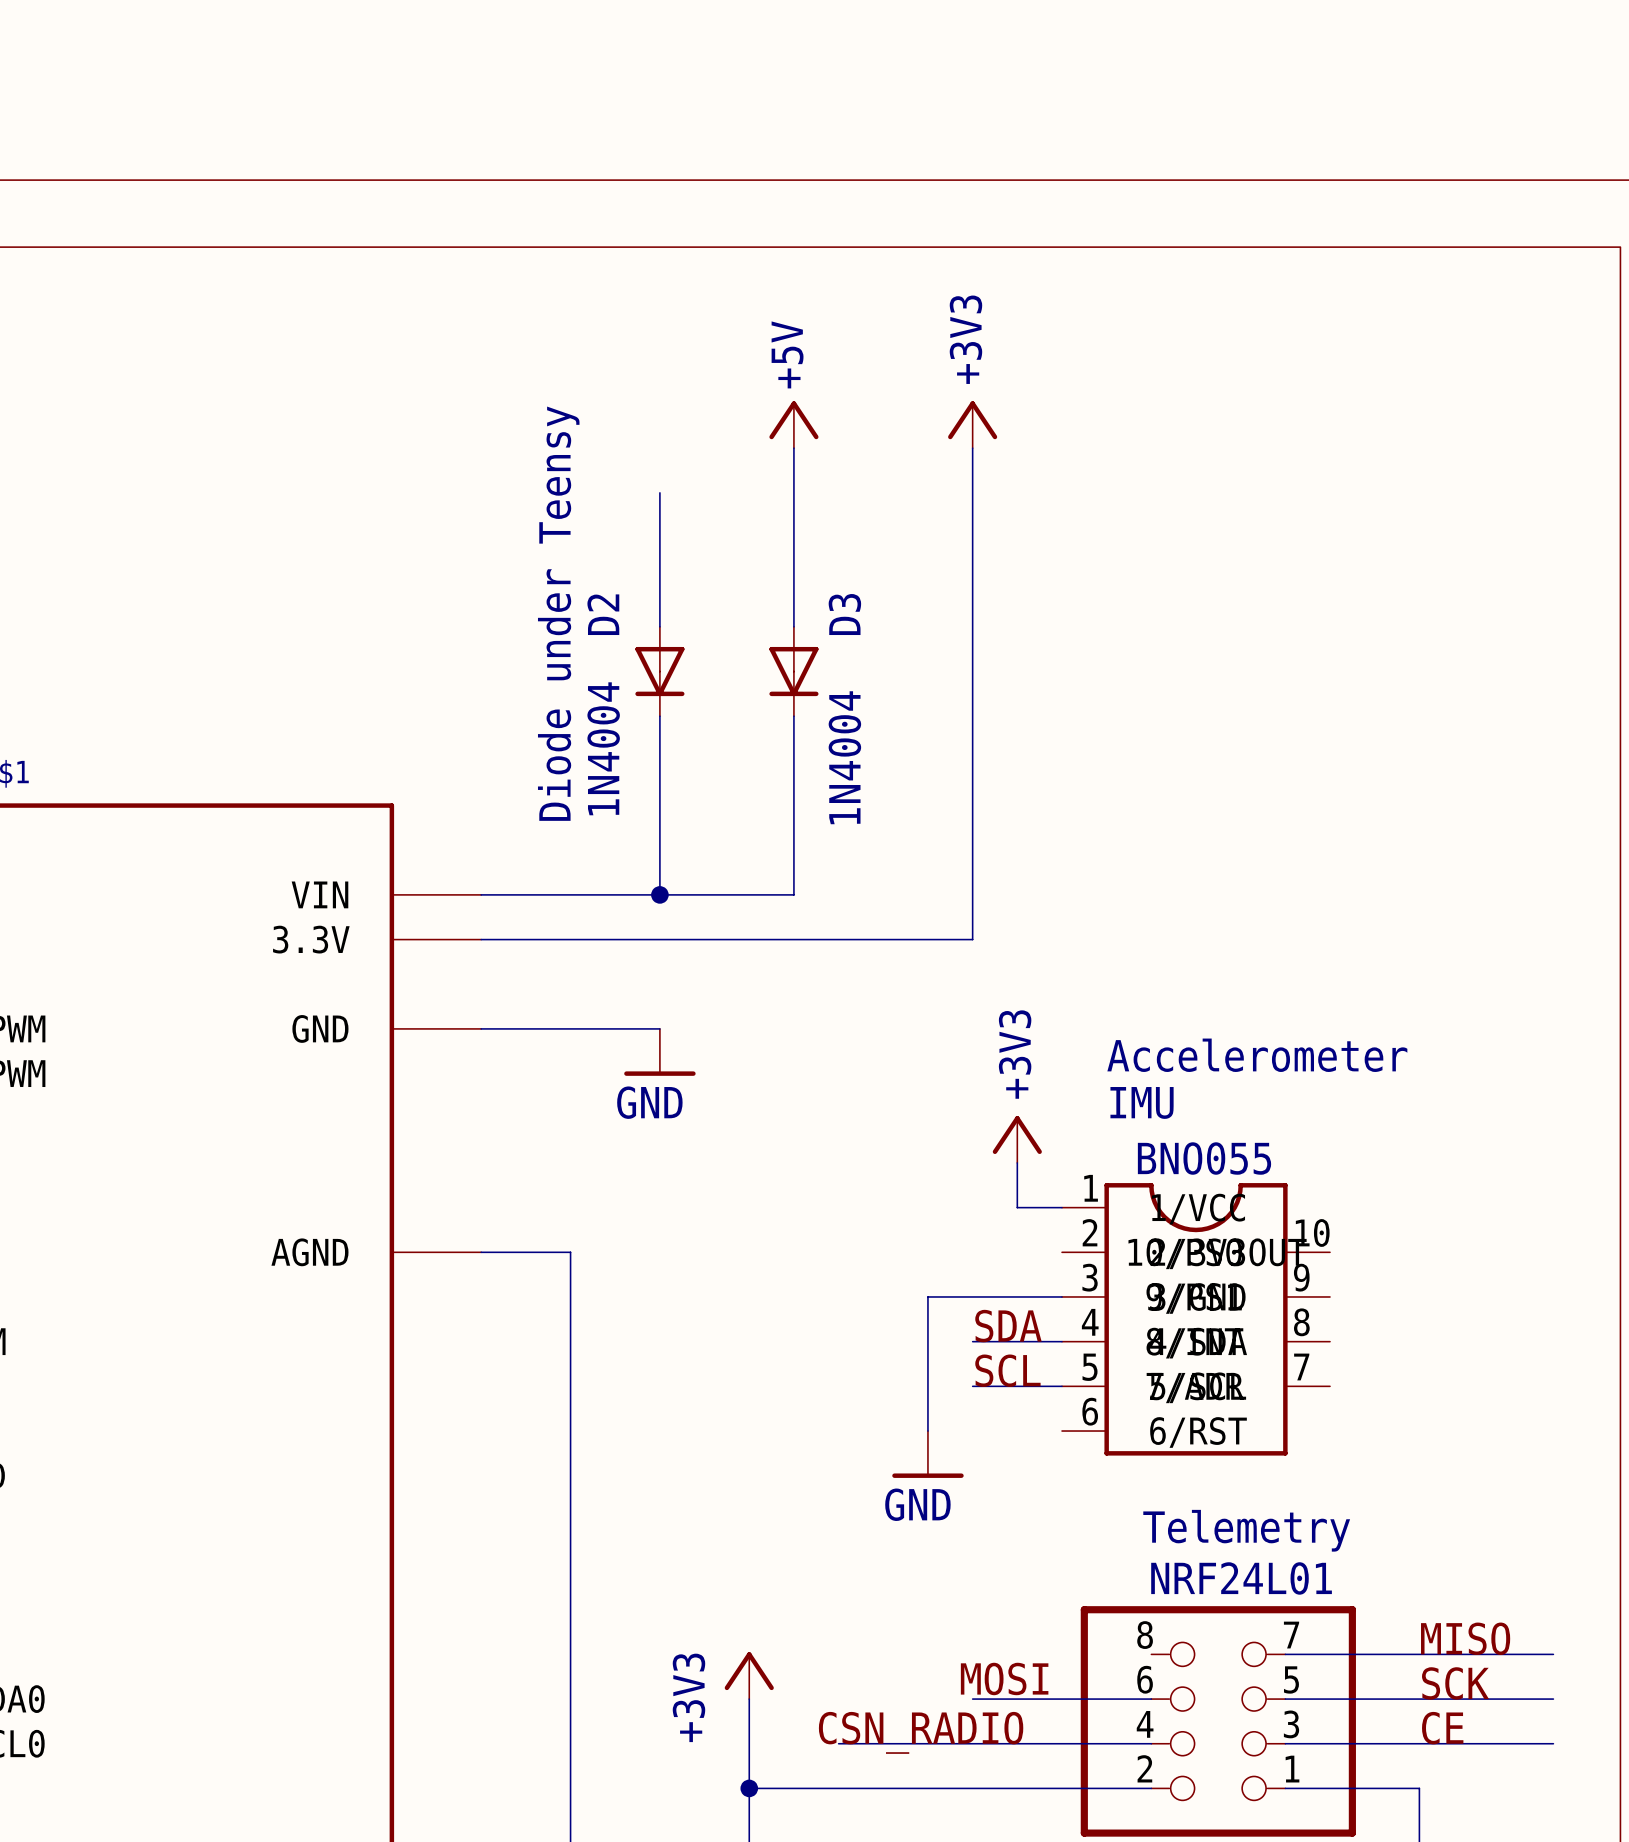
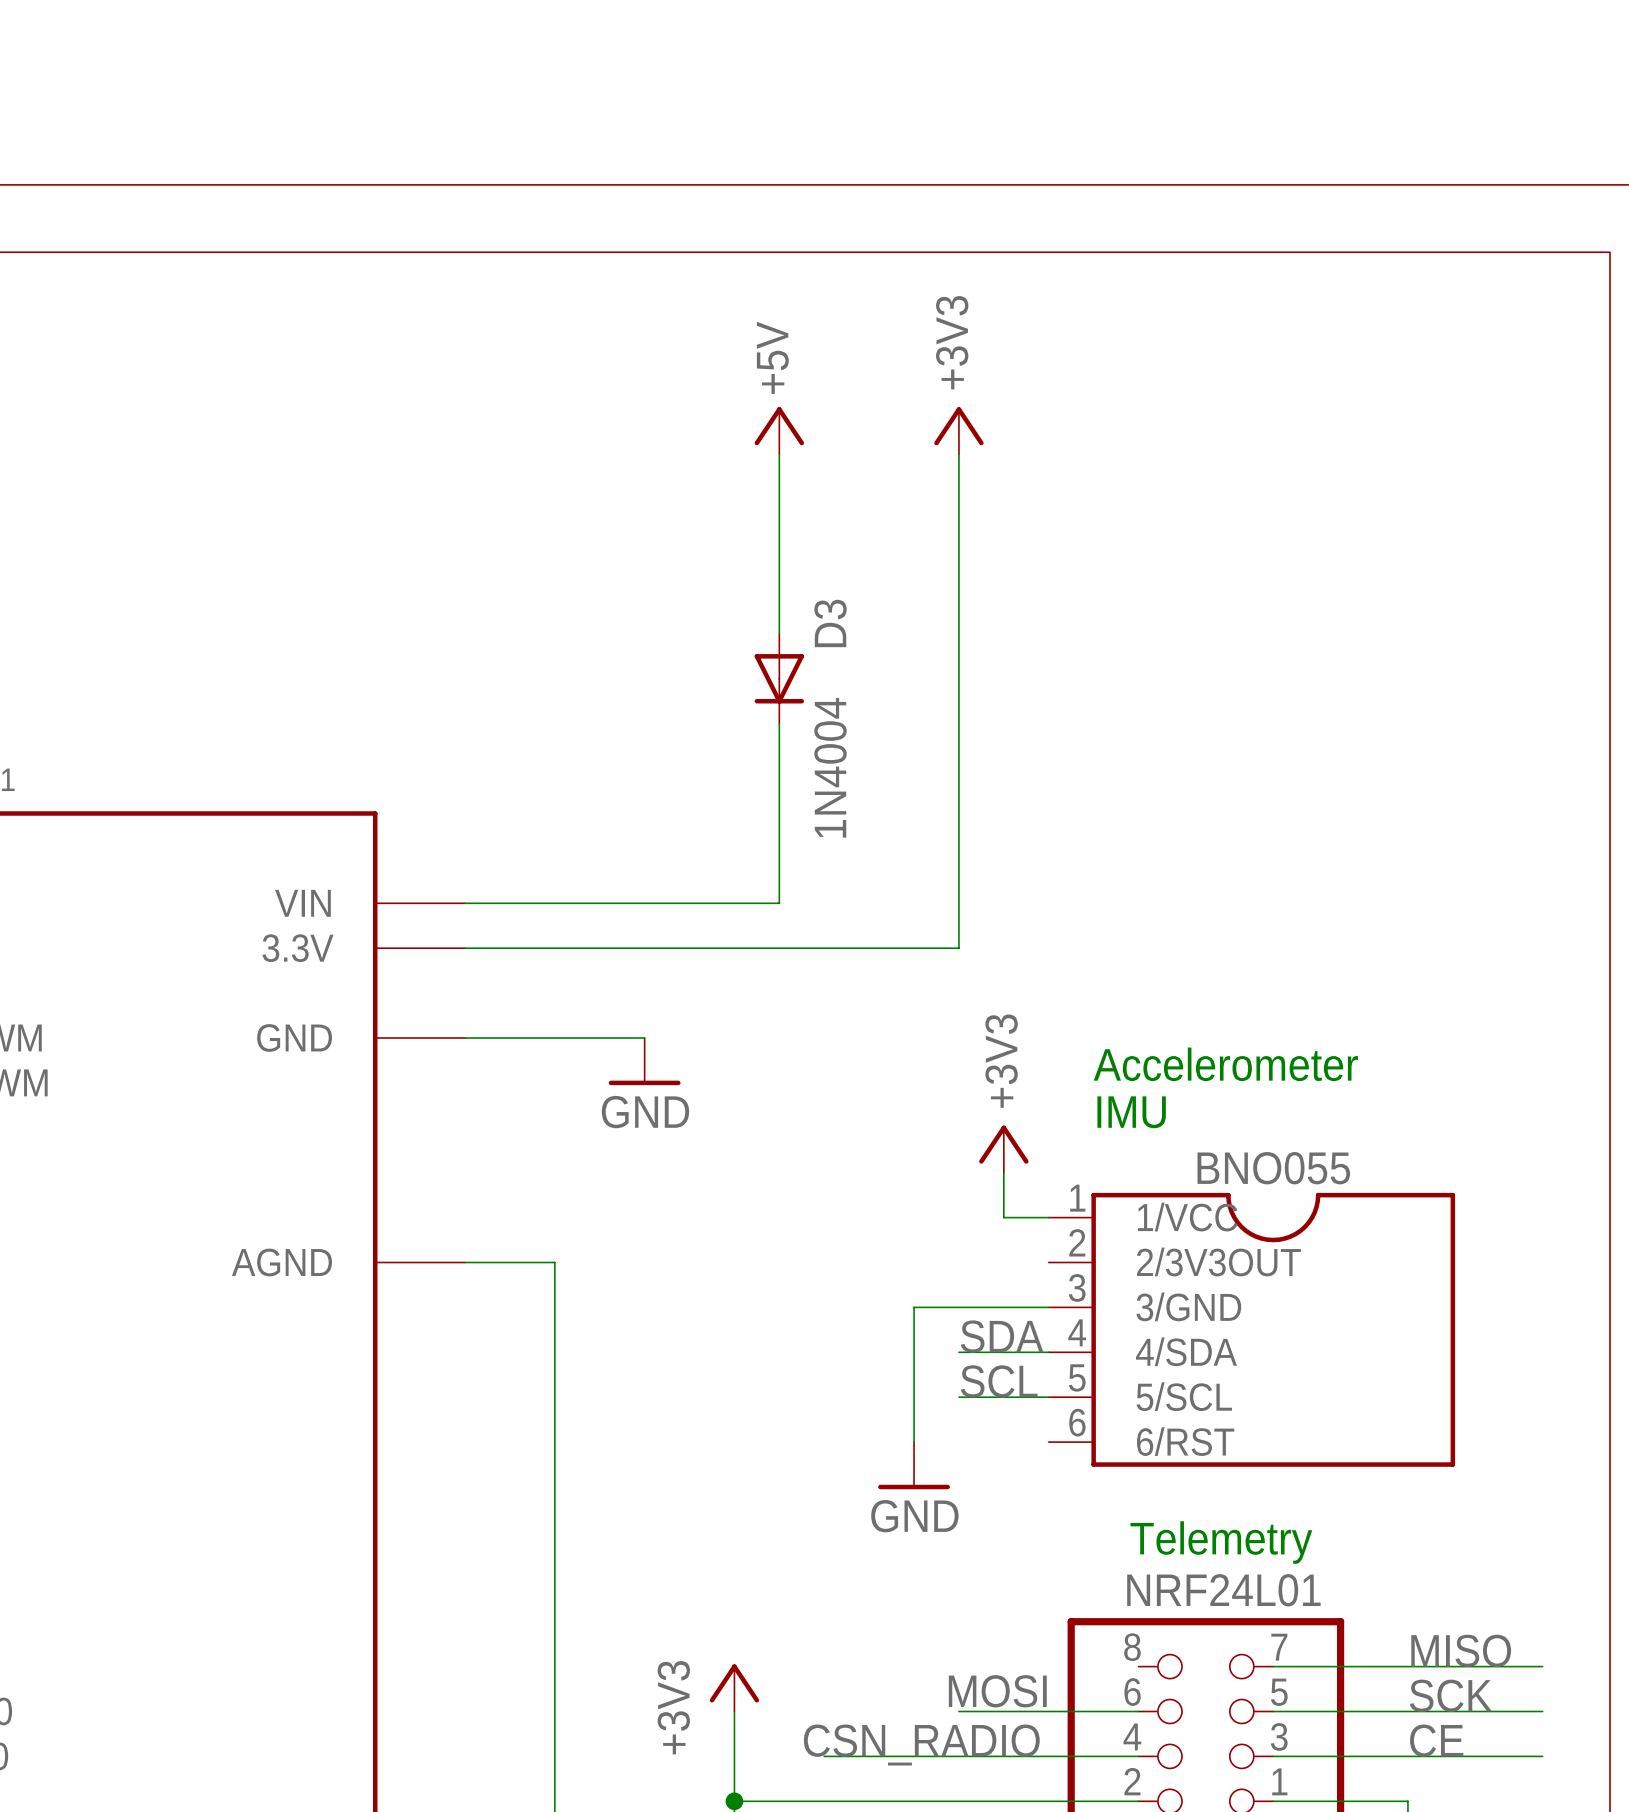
wire: (659, 492) (659, 626) -> none
text: Diode under Teensy (558, 613) -> none
D2: 1N4004 (659, 671) -> none
wire: (659, 716) (659, 894) -> none
junction: (659, 894) -> none
part: (1196, 1319) -> none
part: none -> (1251, 1329)

